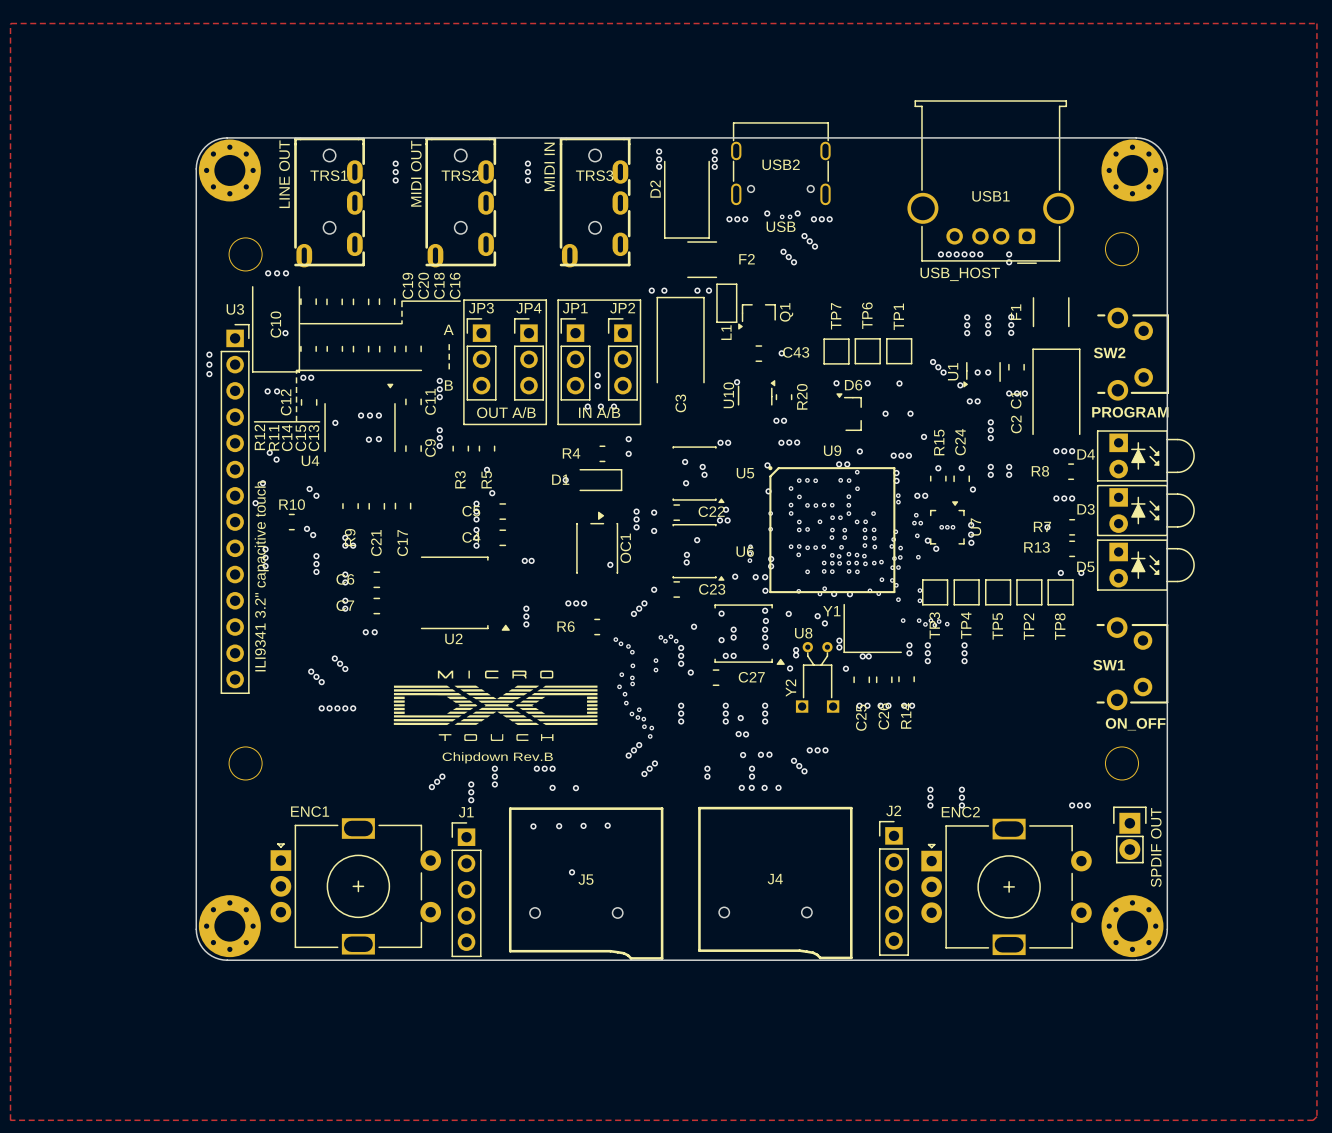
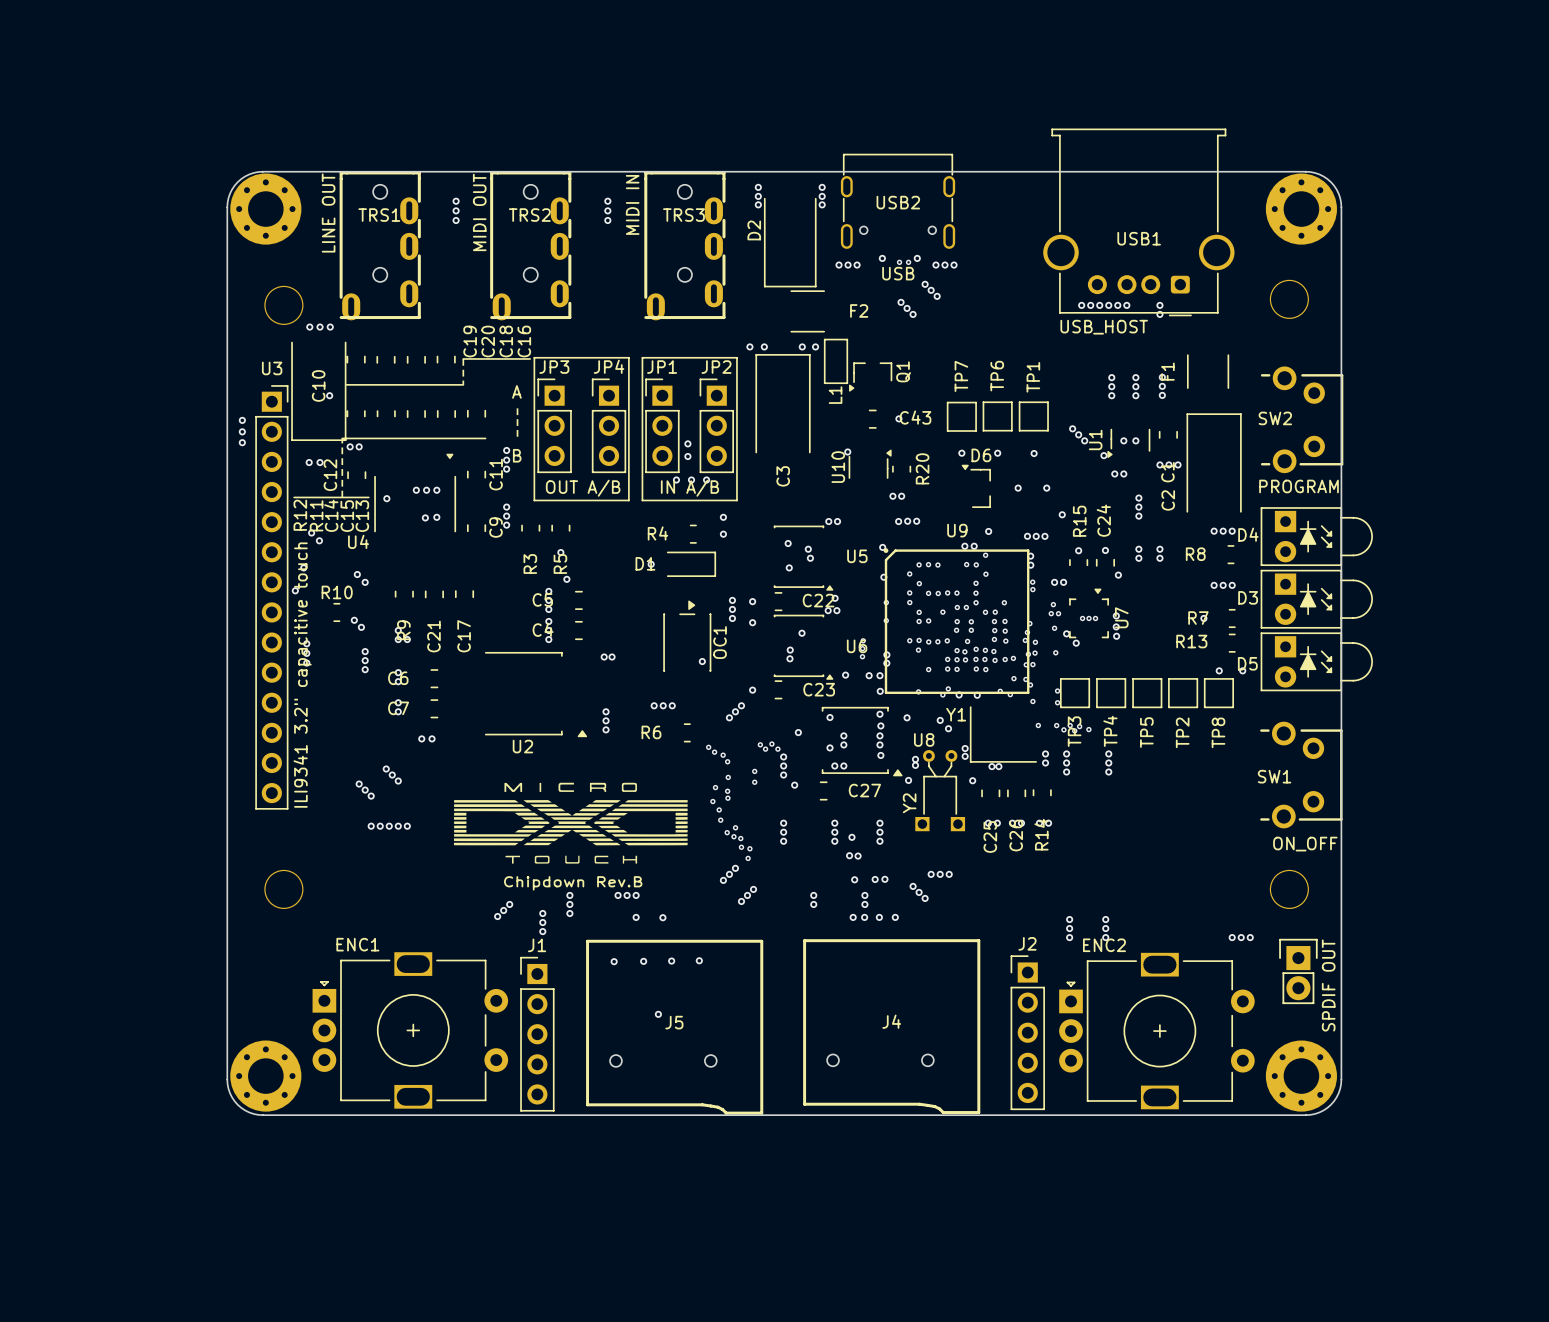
zone outline: (11, 23) (1316, 23) (1316, 1116) (1313, 1120) (10, 1120) (11, 23) -> none

